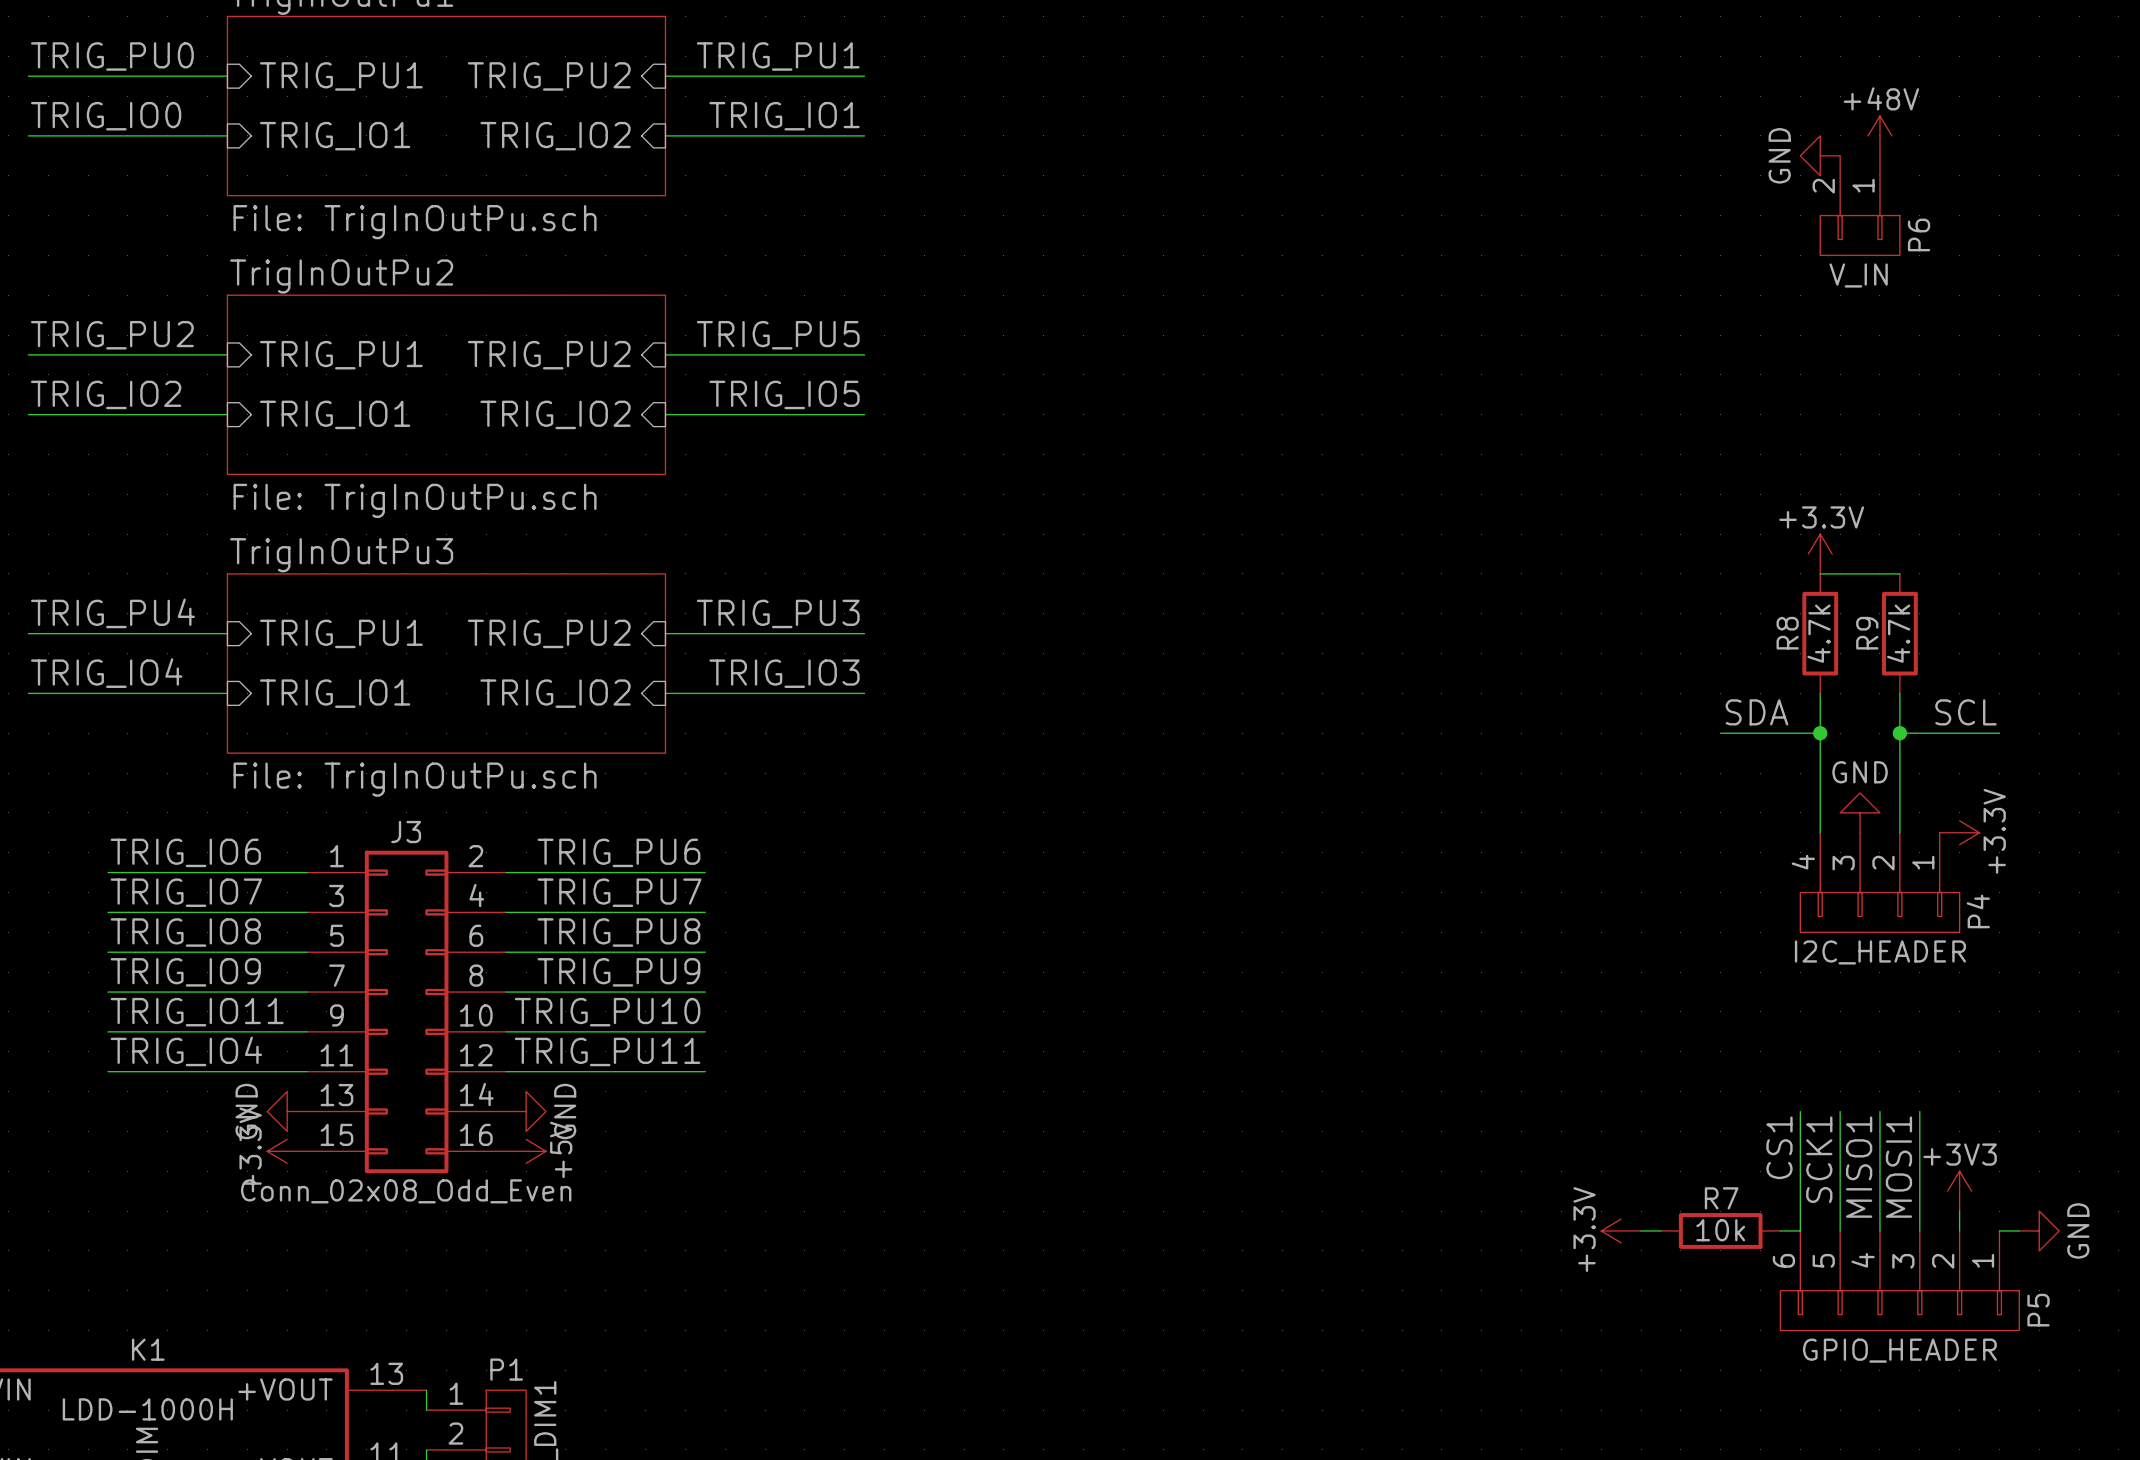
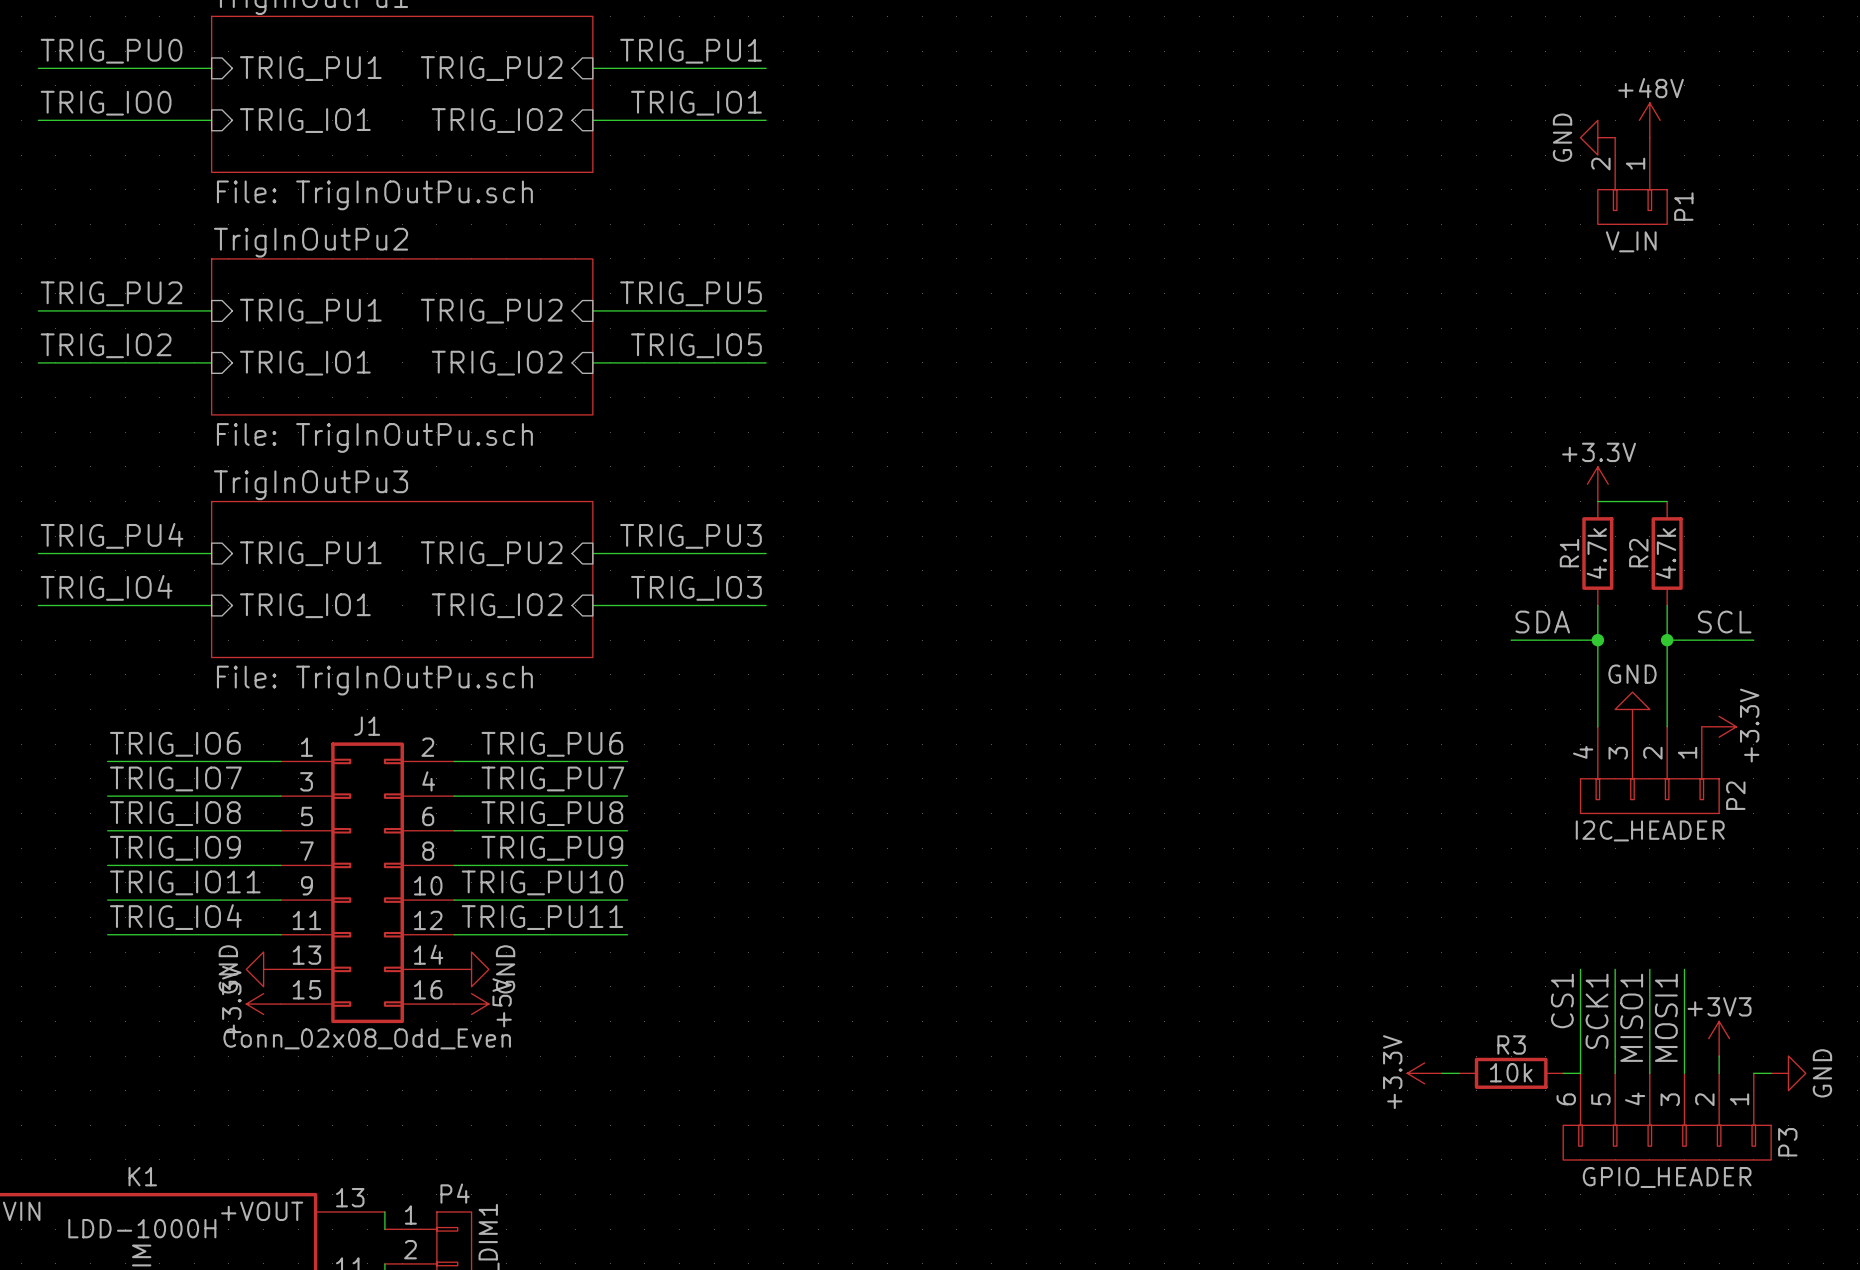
P6 name: P6 (1919, 234) -> P1 (1683, 206)
R8 name: R8 (1787, 633) -> R1 (1569, 553)
R9 name: R9 (1867, 633) -> R2 (1638, 553)
J3 name: J3 (406, 832) -> J1 (367, 726)
P4 name: P4 (1978, 911) -> P2 (1735, 795)
R7 name: R7 (1721, 1198) -> R3 (1511, 1044)
P5 name: P5 (2038, 1310) -> P3 (1787, 1142)
P1 name: P1 (506, 1369) -> P4 (455, 1193)

